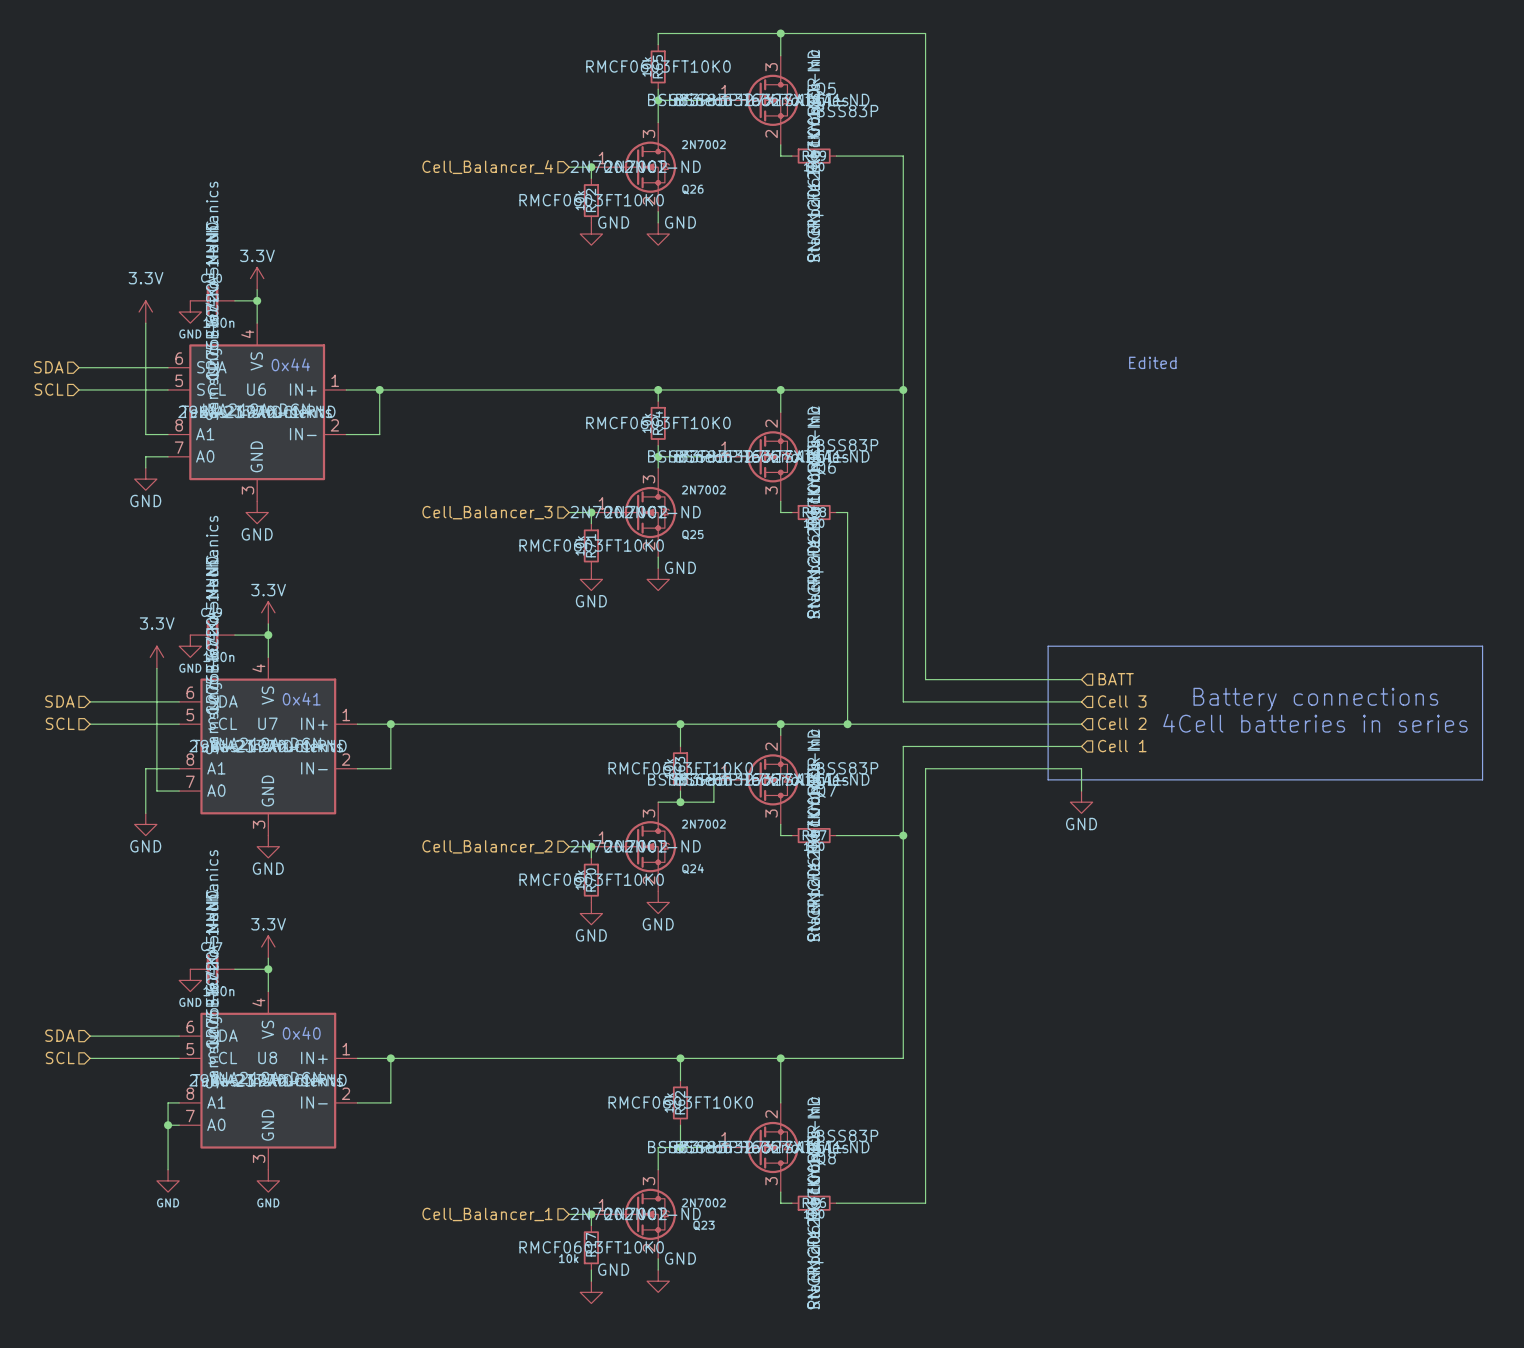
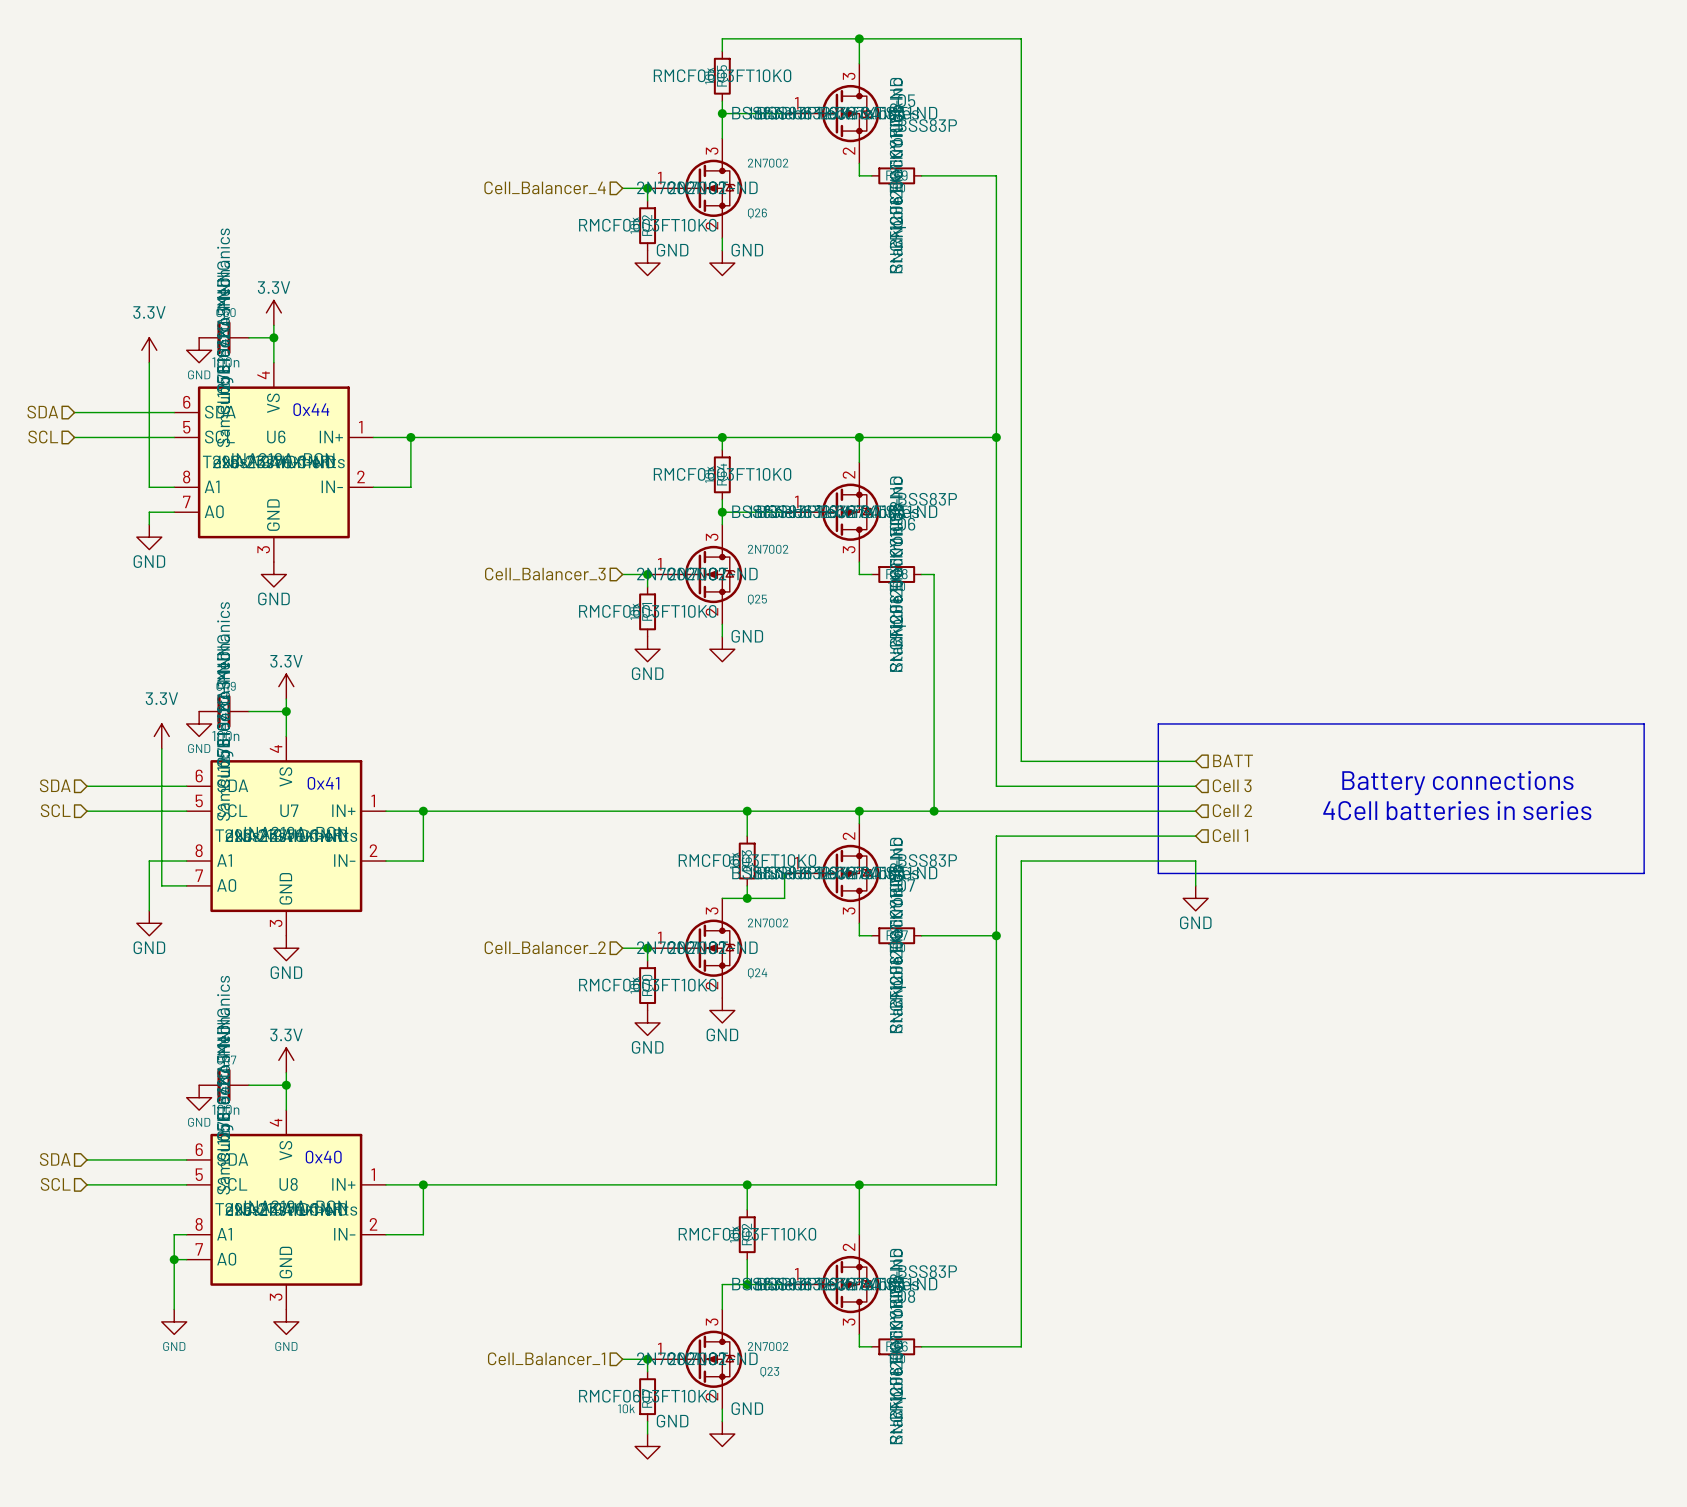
text: Edited (1152, 362) -> none

